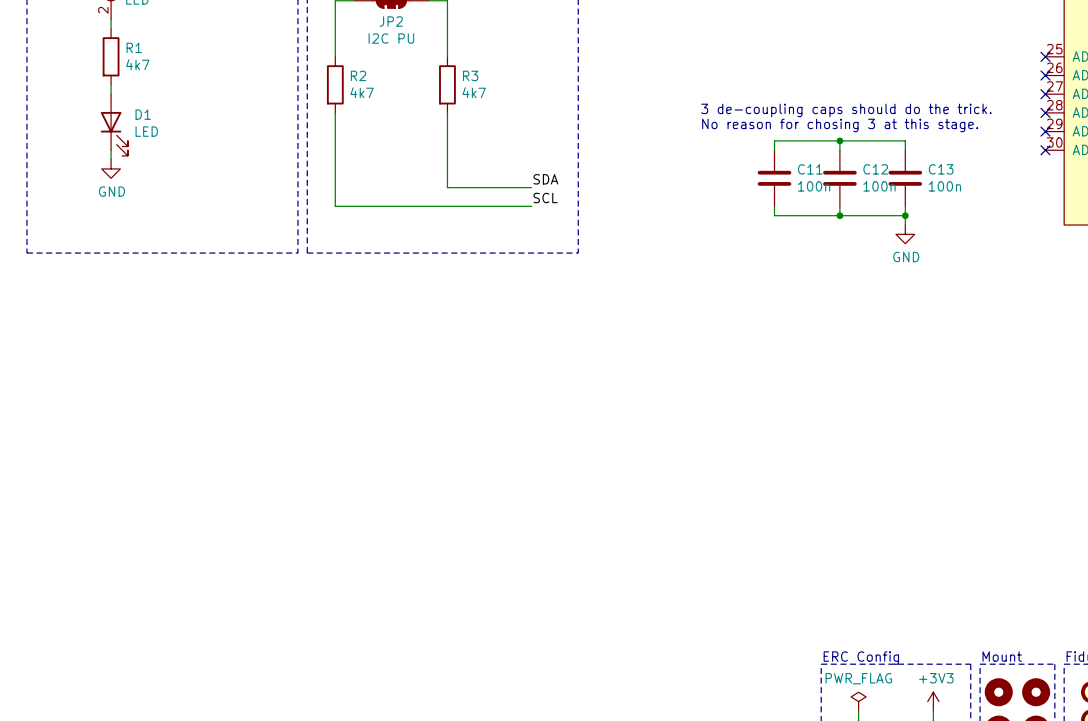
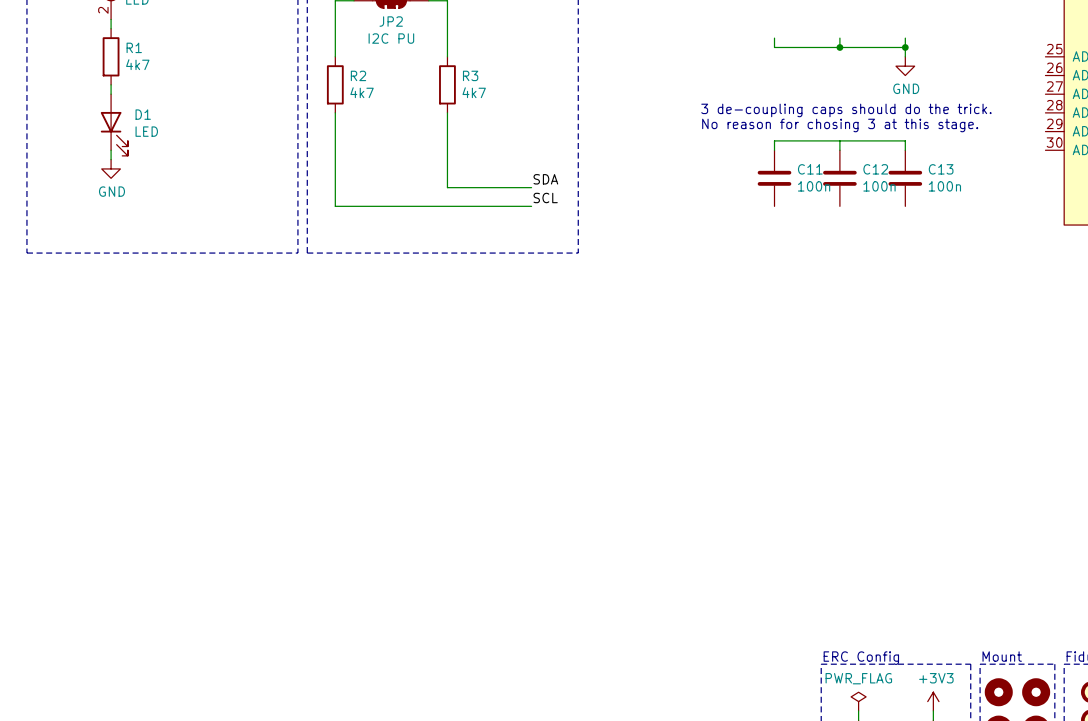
junction: none -> (839, 47)
junction: none -> (905, 47)
no-connect mark: (1045, 56) -> none
power symbol: none -> GND (905, 66)
no-connect mark: (1045, 75) -> none
no-connect mark: (1045, 94) -> none
no-connect mark: (1045, 112) -> none
no-connect mark: (1045, 131) -> none
junction: (839, 140) -> none
no-connect mark: (1045, 150) -> none
wire: (774, 206) (774, 215) (905, 215) -> (774, 38) (774, 47) (905, 47)
wire: (839, 206) (839, 215) -> (839, 38) (839, 47)
wire: (905, 206) (905, 225) -> (905, 38) (905, 56)
junction: (839, 215) -> none
junction: (905, 215) -> none
power symbol: GND (905, 234) -> none

